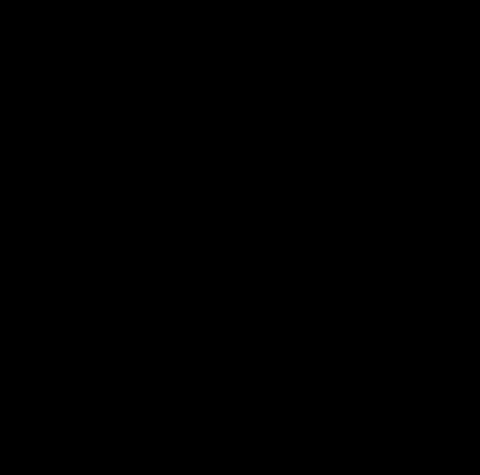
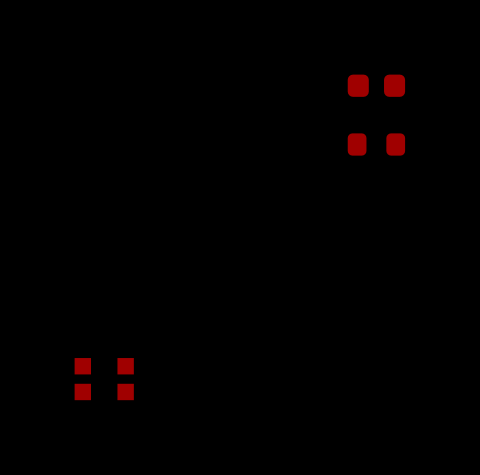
part: none -> (376, 85)
part: none -> (376, 144)
part: none -> (104, 379)

